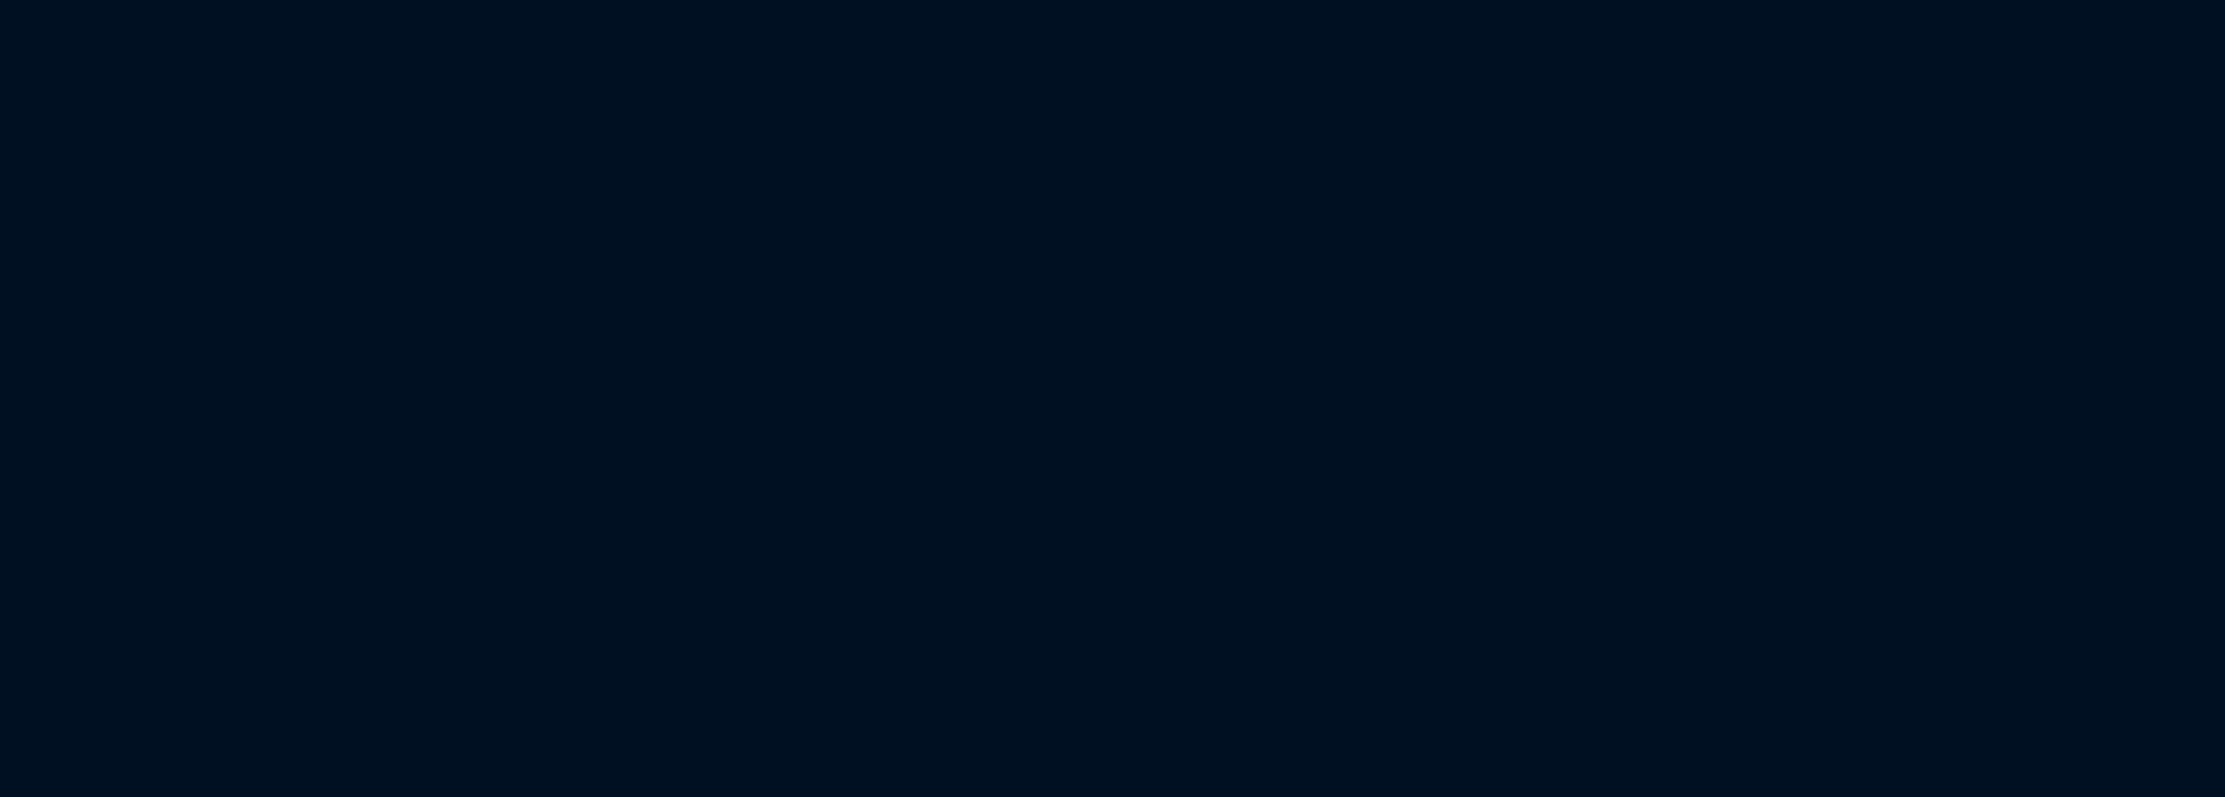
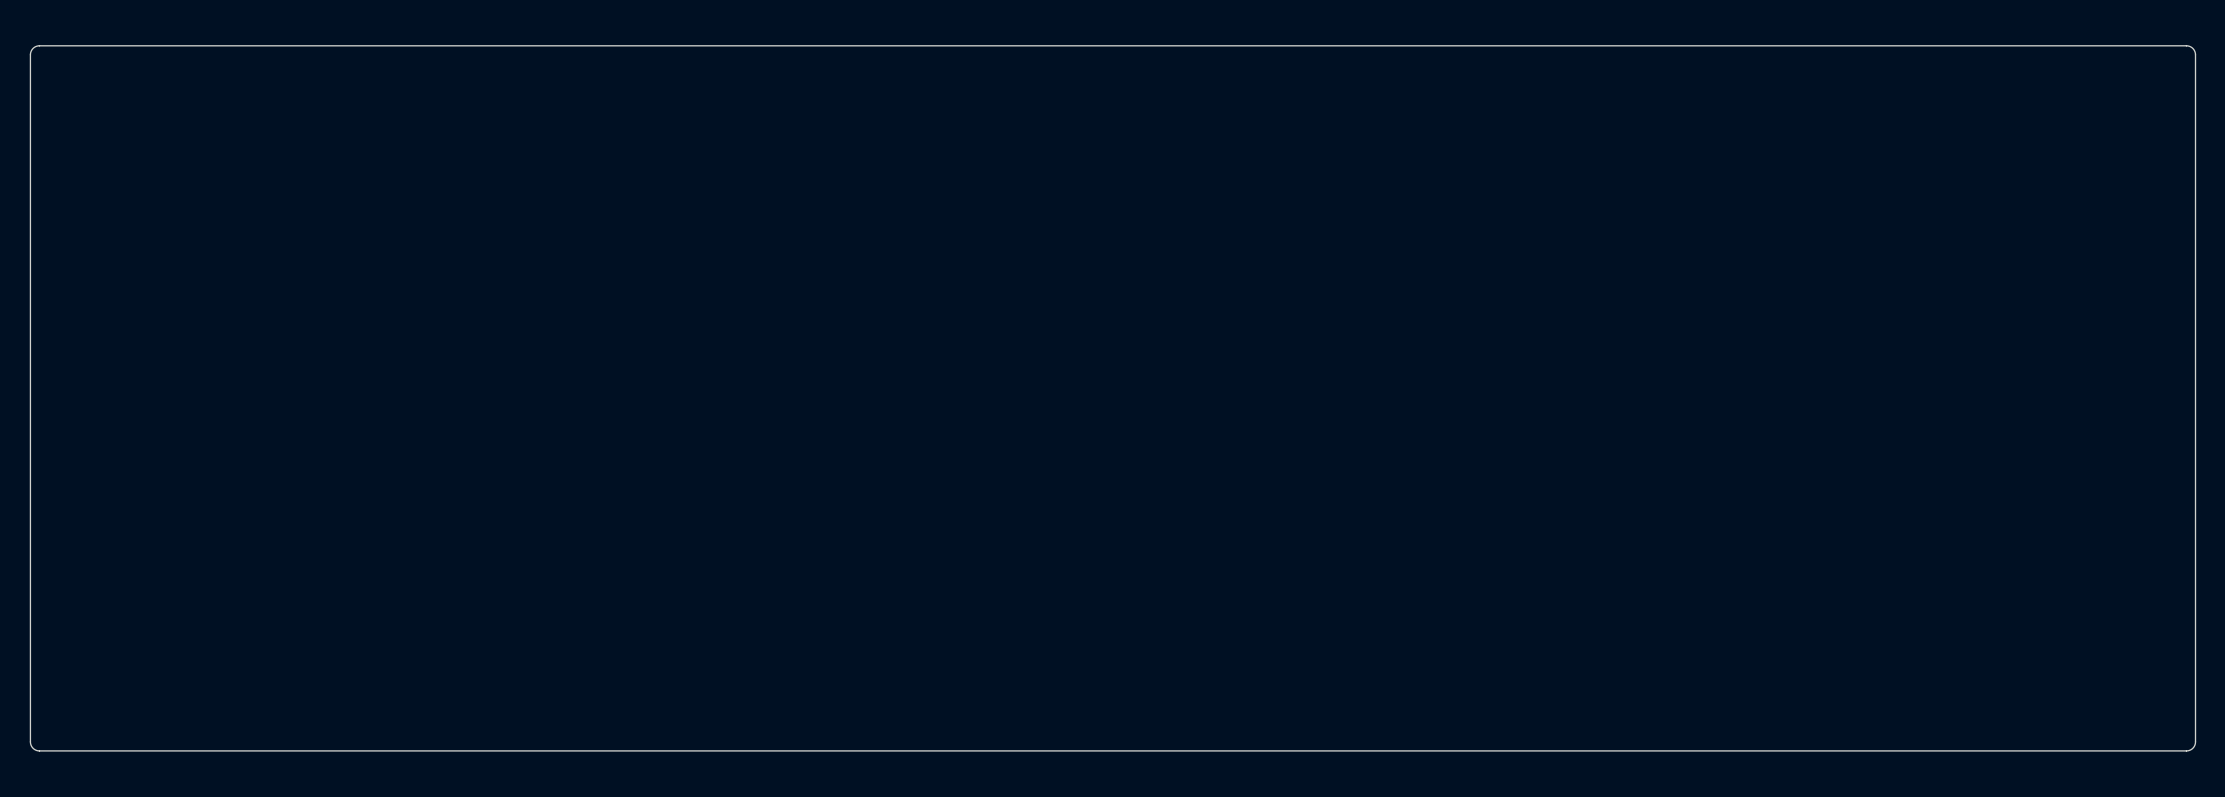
board edge: none -> (39, 45) (2189, 46) (2193, 49) (2195, 54) (2195, 744) (2192, 748) (2186, 750) (36, 750) (32, 747) (30, 741) (30, 54) (33, 48) (39, 45)

